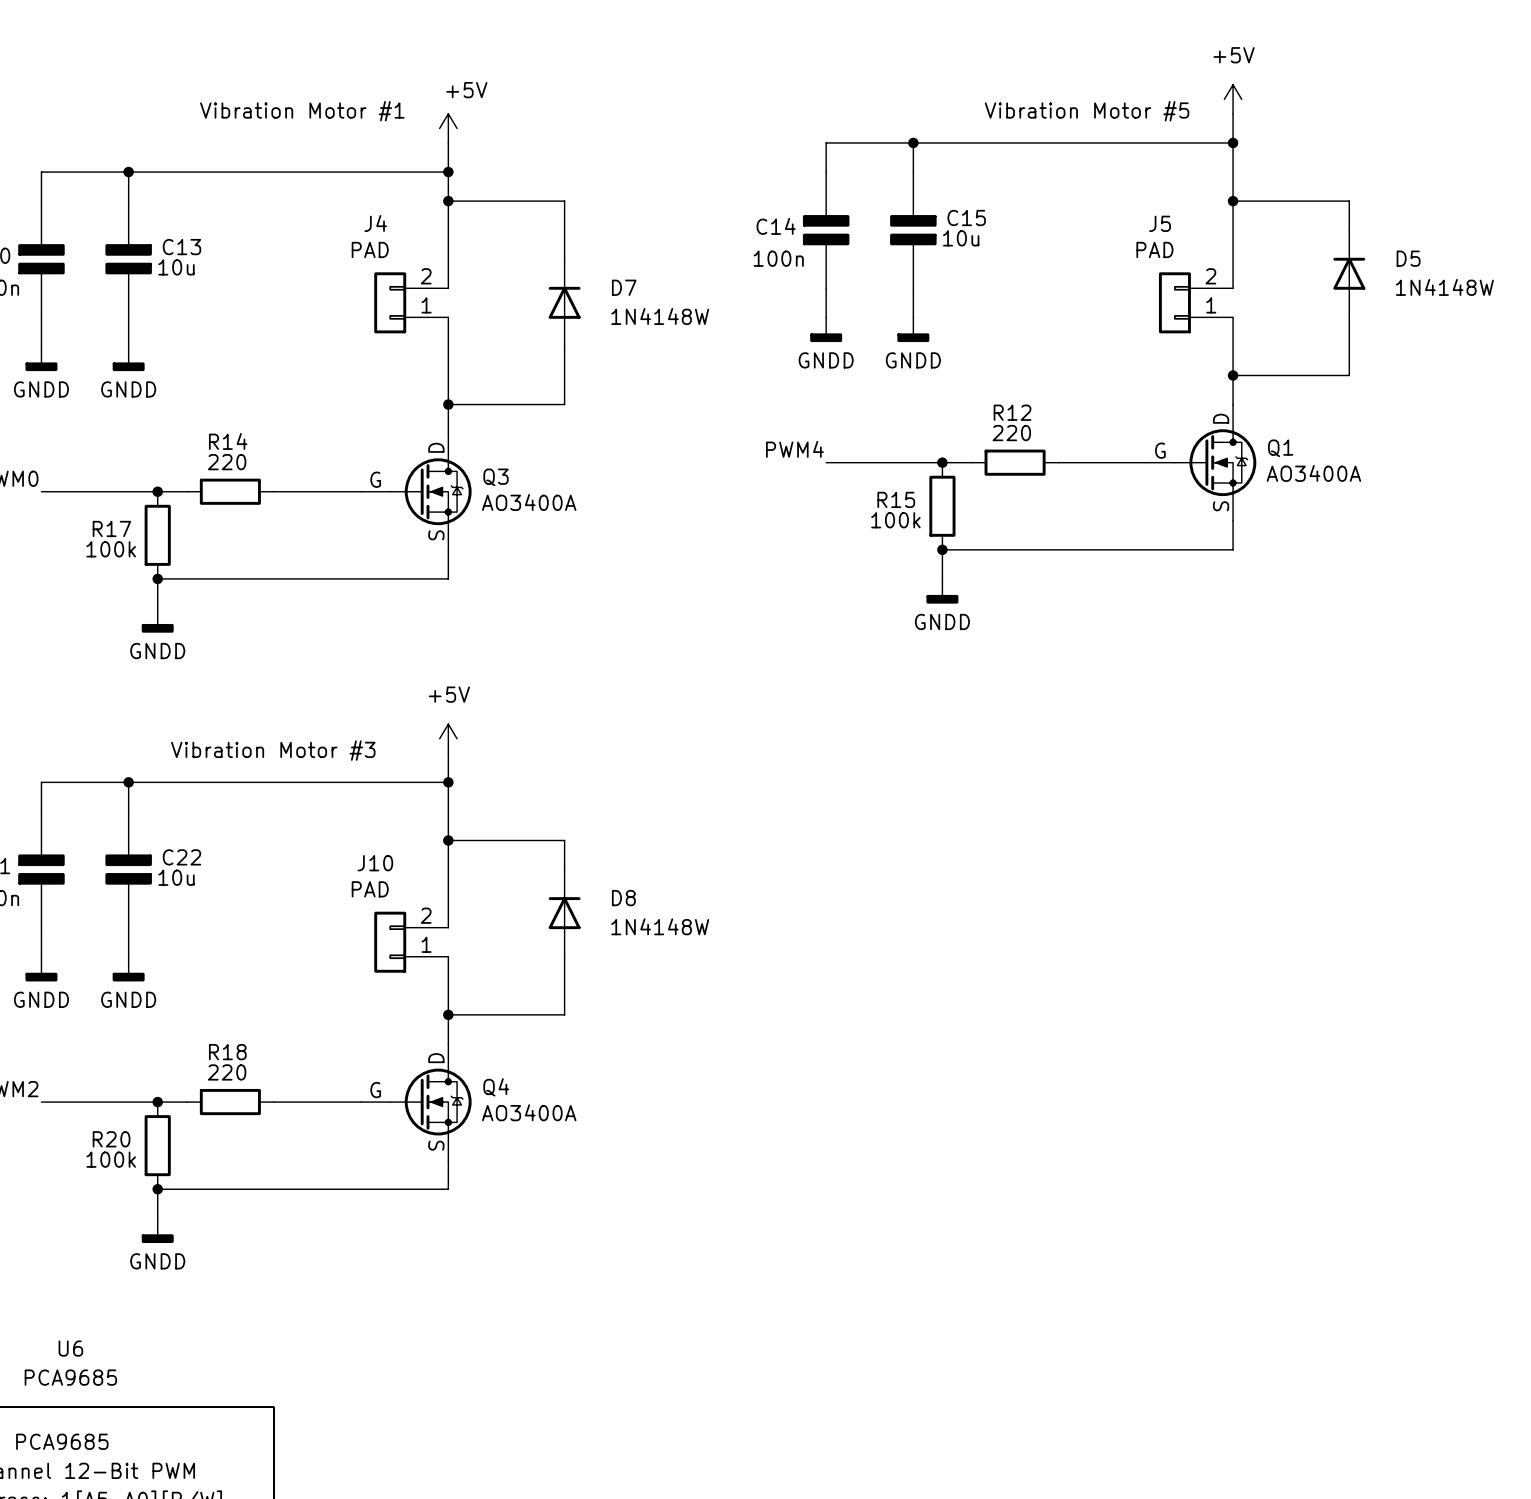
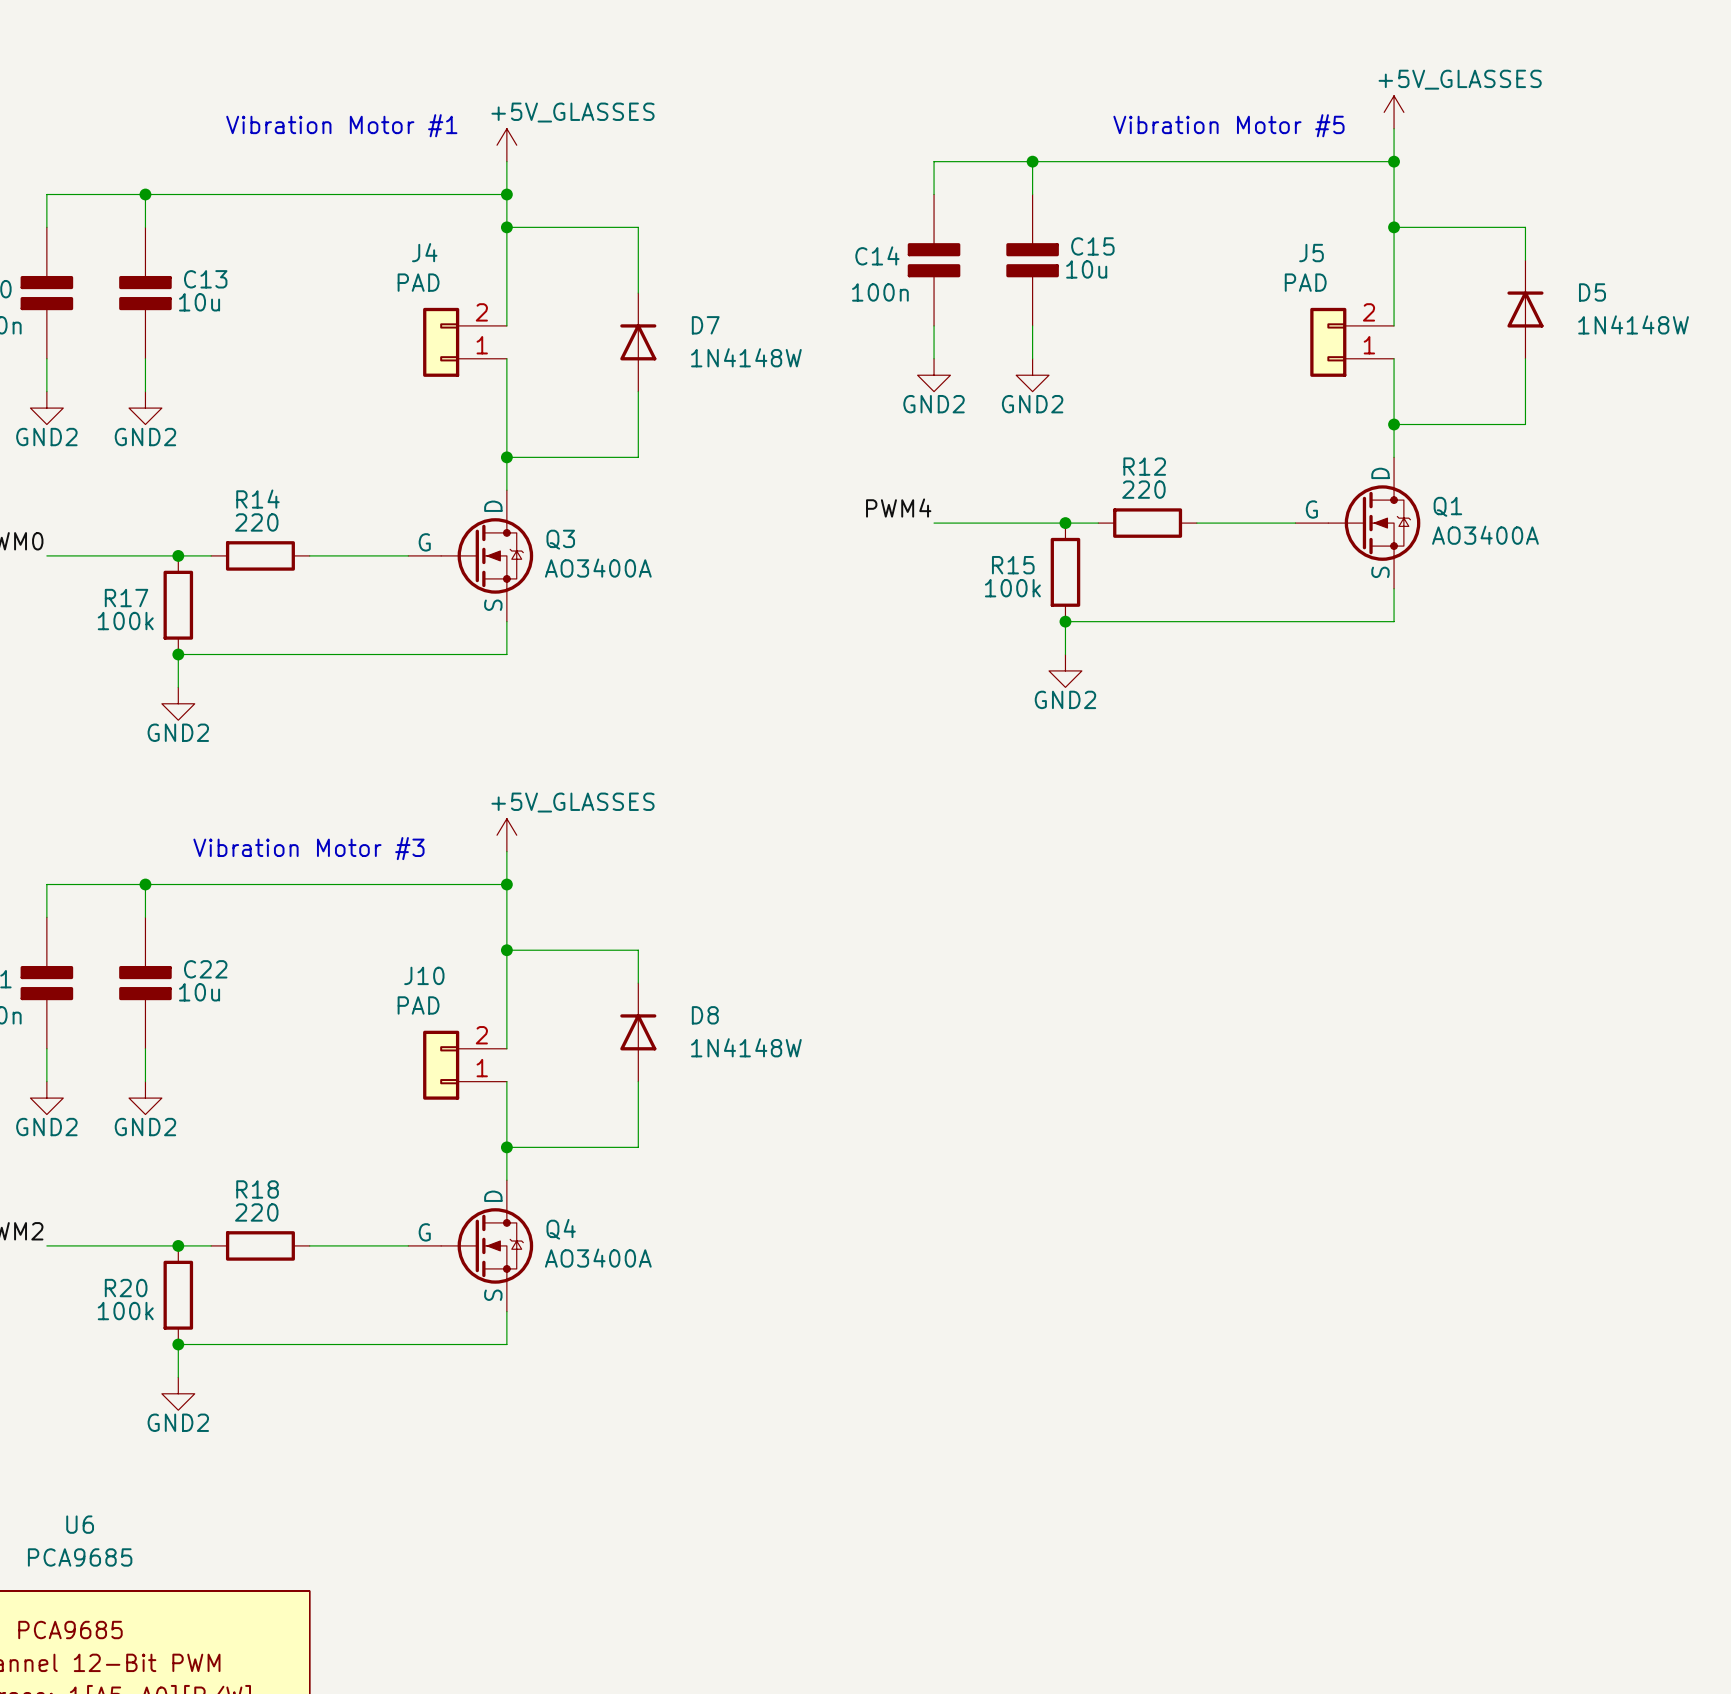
power symbol: +5V (1233, 99) -> +5V_GLASSES (1394, 112)
power symbol: +5V (448, 128) -> +5V_GLASSES (506, 145)
power symbol: GNDD (826, 329) -> GND2 (934, 375)
power symbol: GNDD (913, 329) -> GND2 (1032, 375)
power symbol: GNDD (41, 358) -> GND2 (46, 408)
power symbol: GNDD (128, 358) -> GND2 (145, 408)
power symbol: GNDD (942, 591) -> GND2 (1065, 670)
power symbol: GNDD (157, 620) -> GND2 (178, 703)
power symbol: +5V (448, 738) -> +5V_GLASSES (506, 835)
power symbol: GNDD (41, 969) -> GND2 (46, 1098)
power symbol: GNDD (128, 969) -> GND2 (145, 1098)
power symbol: GNDD (157, 1230) -> GND2 (178, 1393)

